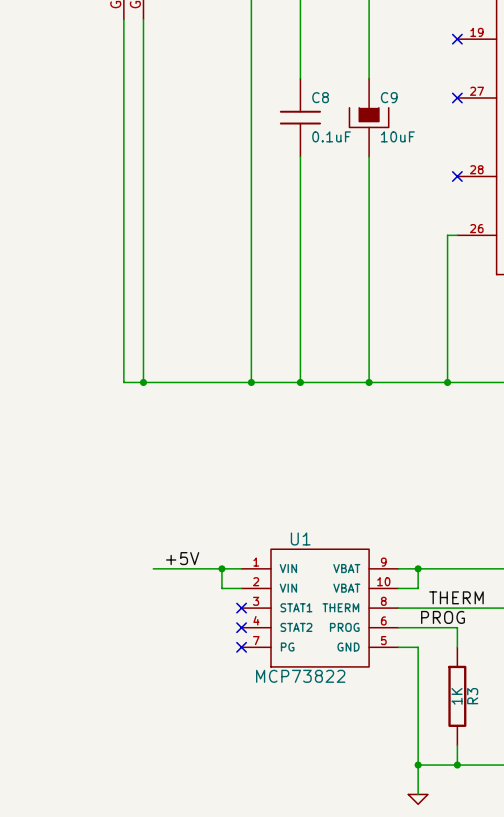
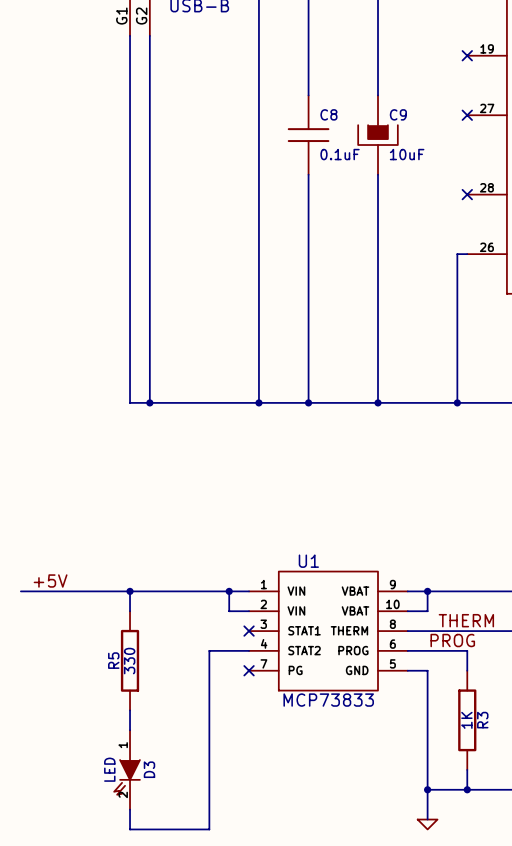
label position: +5V (182, 558) -> +5V (50, 581)
wire: none -> (20, 591) (159, 591)
wire: none -> (130, 591) (130, 611)
junction: none -> (130, 591)
wire: none -> (249, 650) (209, 650) (209, 829) (130, 829) (130, 809)
no-connect mark: (241, 627) -> none
R5: none -> 330 (130, 660)
U1 value: MCP73822 (300, 676) -> MCP73833 (328, 700)
wire: none -> (130, 710) (130, 730)
D3: none -> LED (127, 769)

